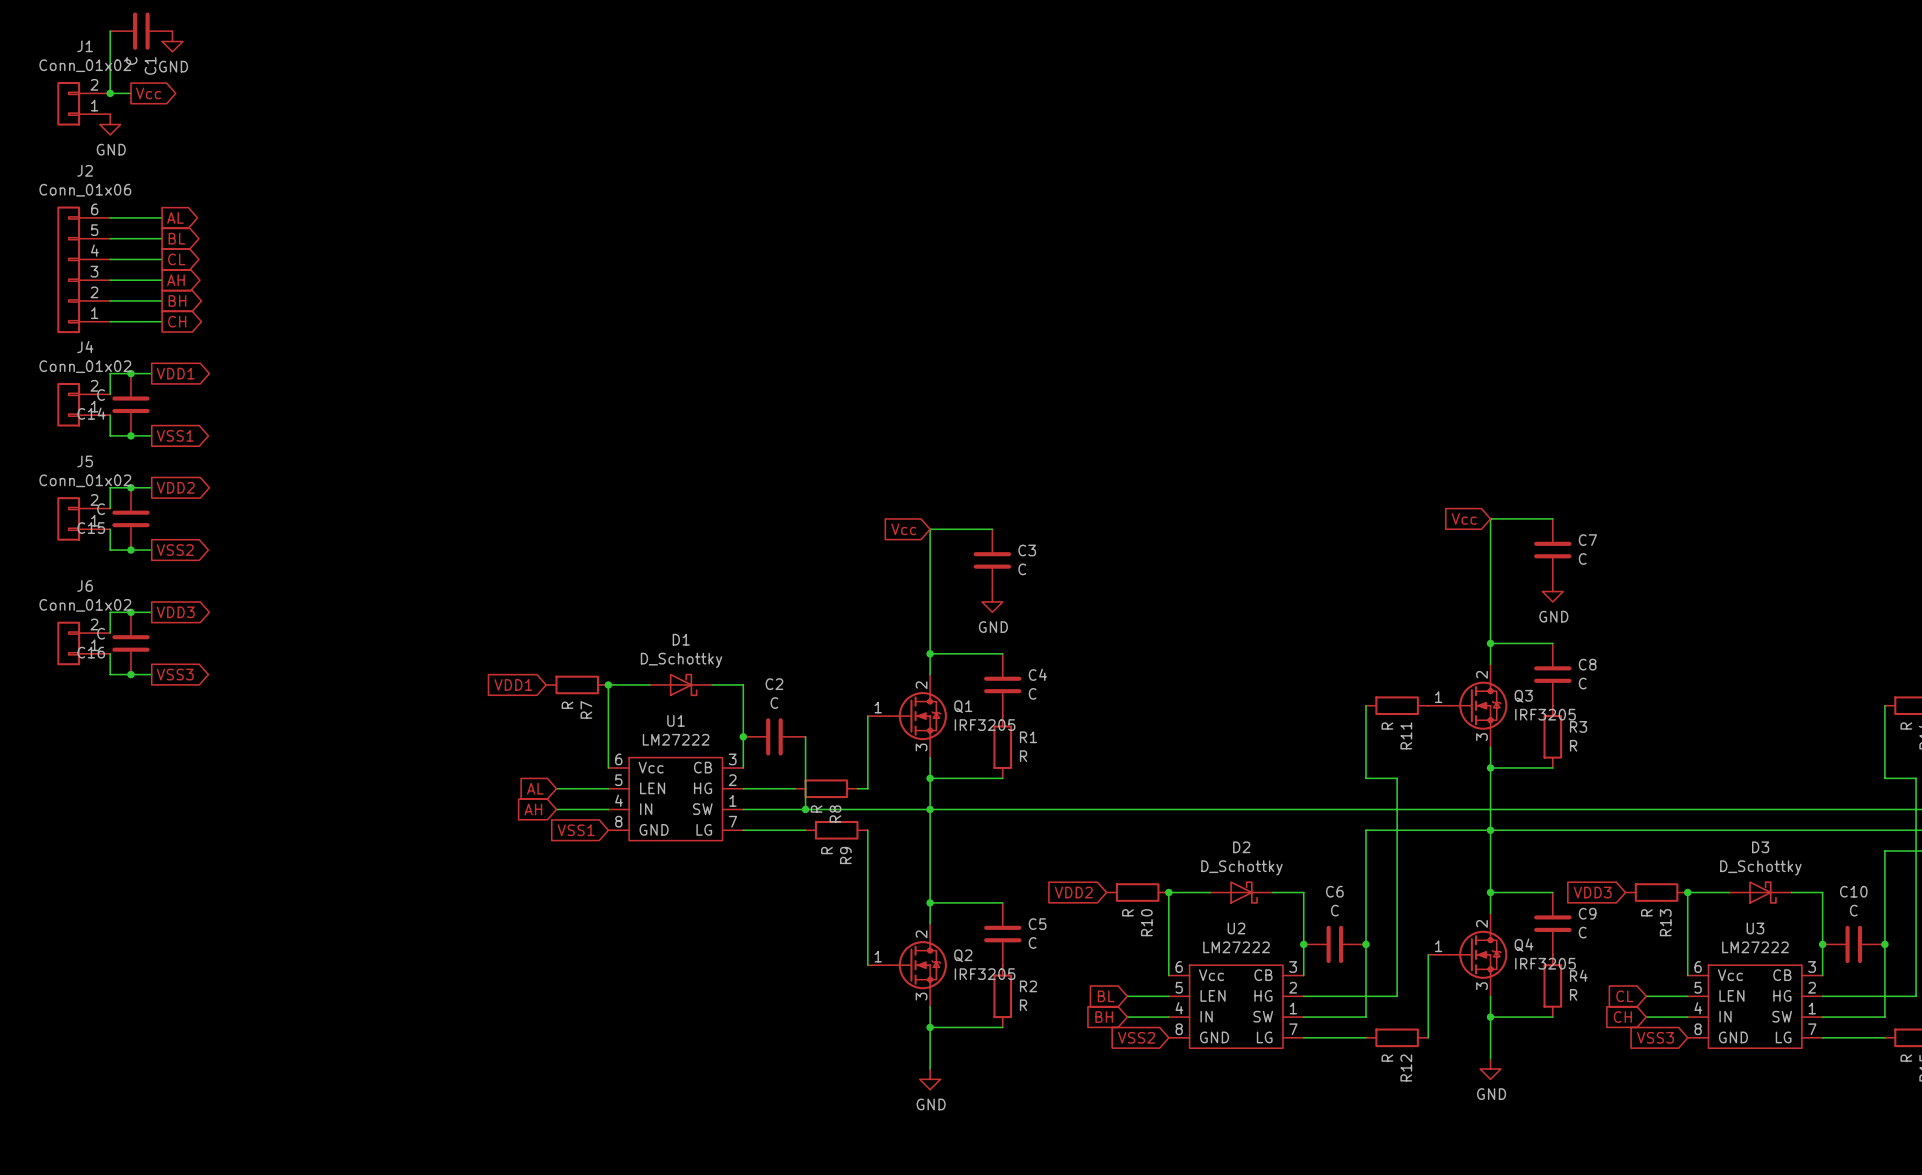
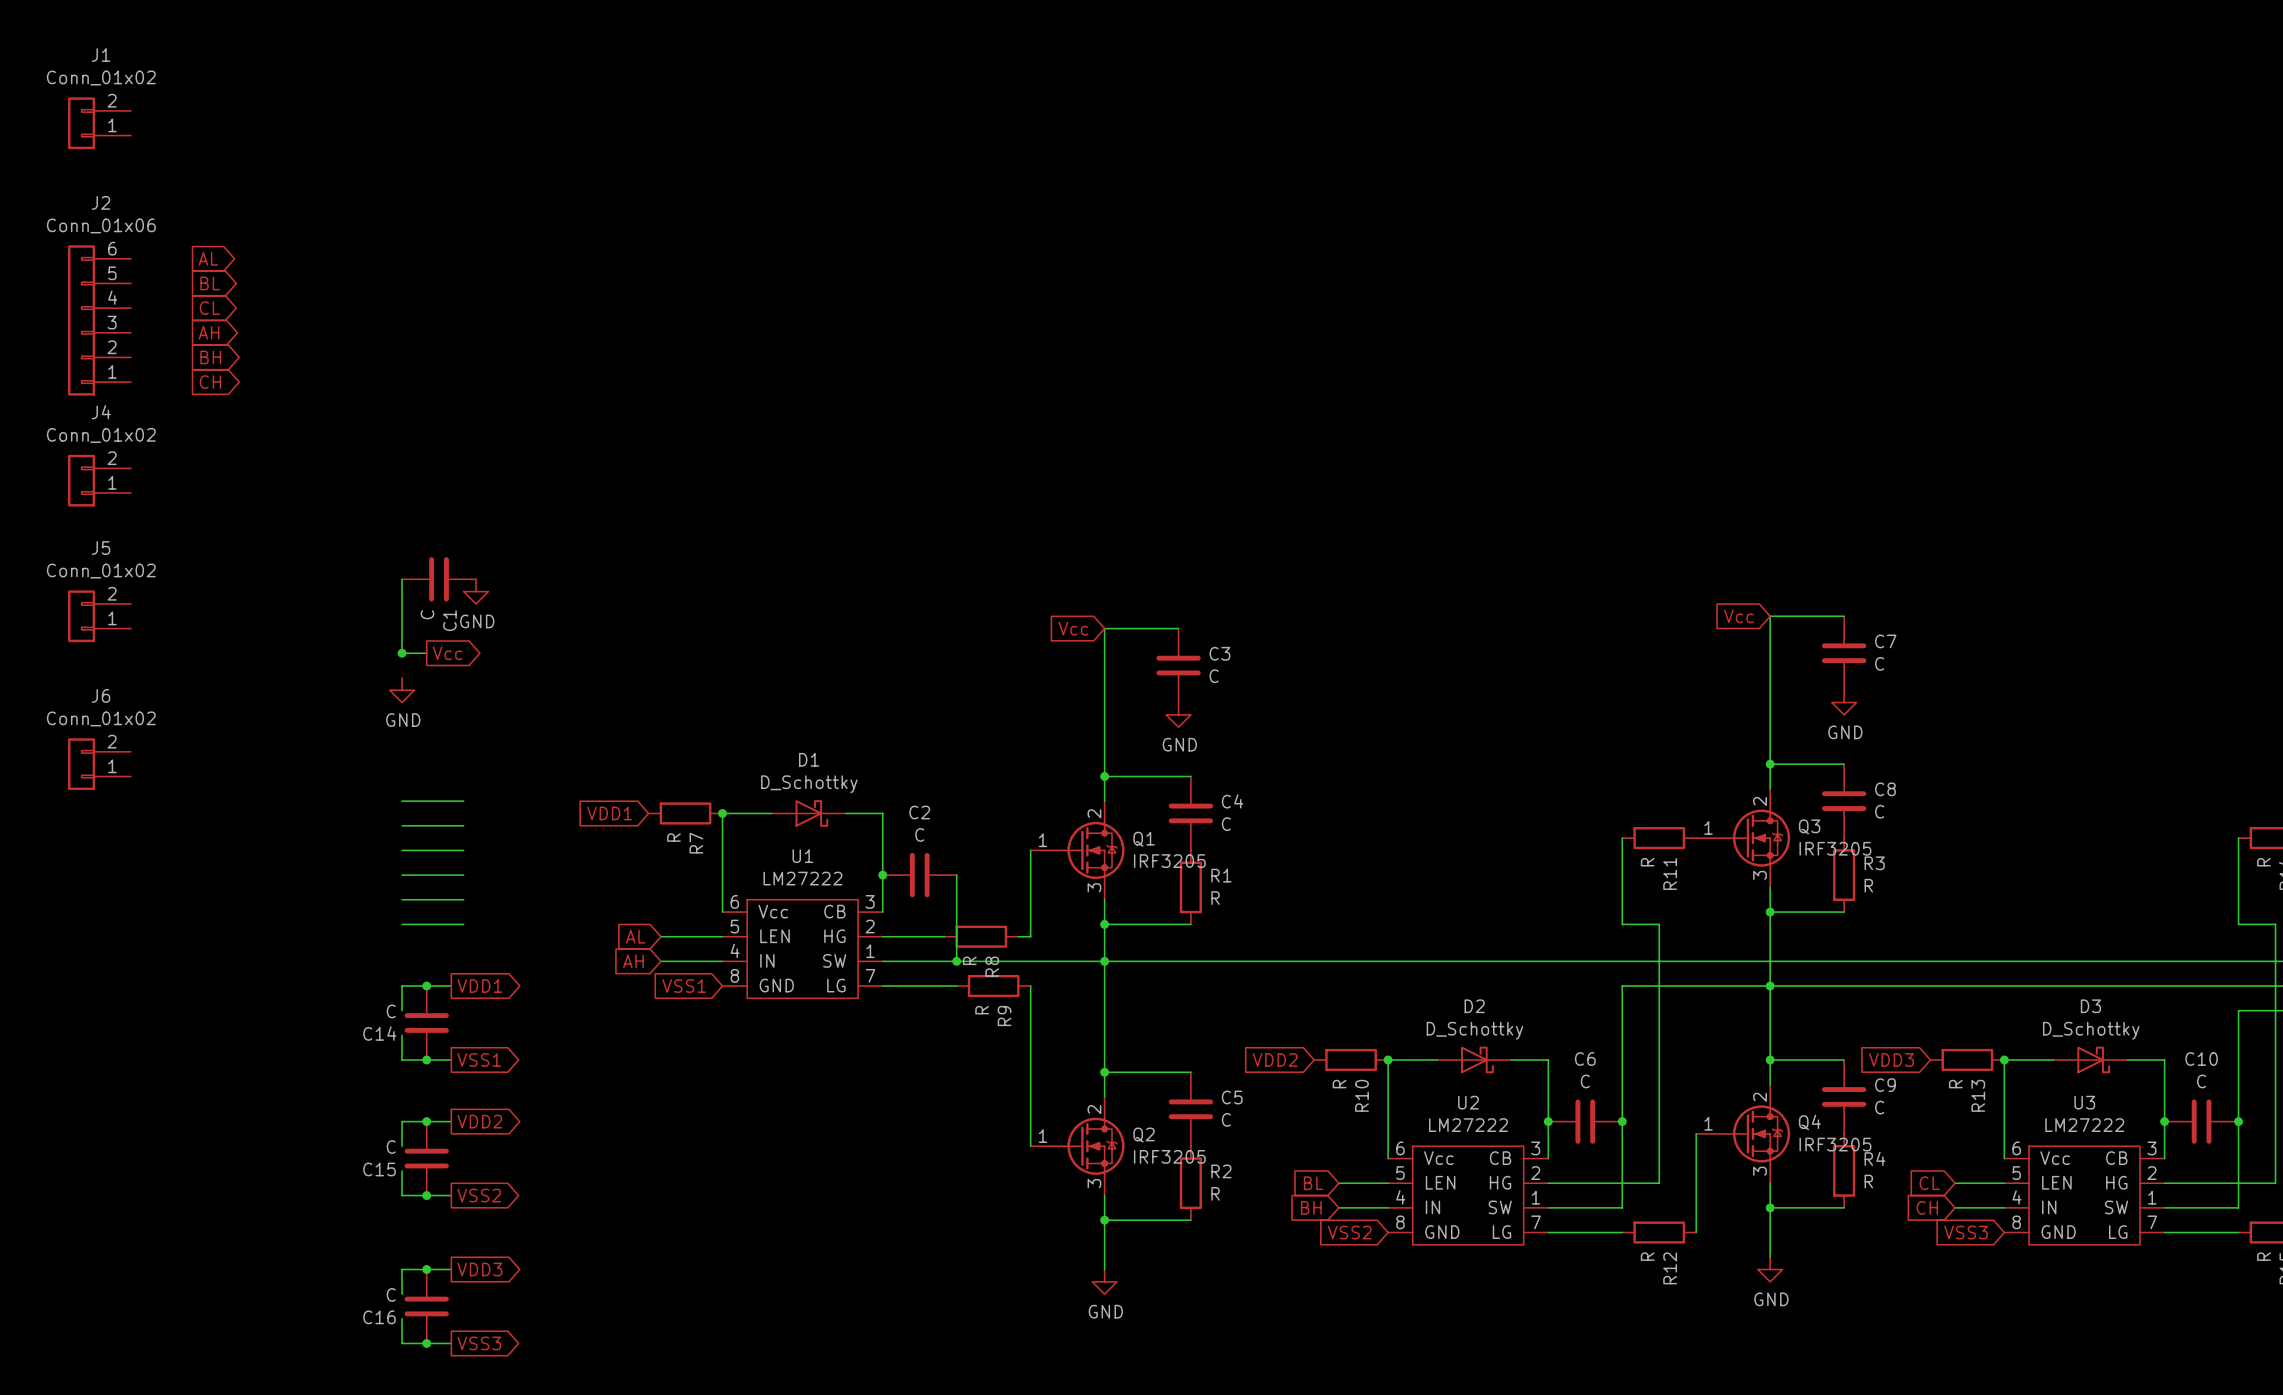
wire: (110, 31) (110, 93) (130, 93) -> none
C1 position: (141, 31) -> (439, 579)
power symbol: GND (172, 41) -> none
junction: (110, 93) -> none
global label: Vcc (148, 93) -> none
power symbol: GND (110, 124) -> none
wire: (110, 217) (162, 217) -> none
wire: (110, 238) (162, 238) -> none
wire: (110, 259) (162, 259) -> none
wire: (110, 280) (162, 280) -> none
wire: (110, 300) (162, 300) -> none
wire: (110, 321) (162, 321) -> none
junction: (130, 373) -> none
wire: (151, 373) (110, 373) (110, 394) -> none
global label: VDD1 (175, 373) -> none
C14 position: (130, 404) -> (426, 1023)
wire: (110, 415) (110, 435) (151, 435) -> none
junction: (130, 435) -> none
global label: VSS1 (175, 435) -> none
junction: (130, 487) -> none
wire: (151, 487) (110, 487) (110, 508) -> none
global label: VDD2 (175, 487) -> none
wire: none -> (402, 579) (402, 653) (426, 653)
power symbol: none -> GND (476, 591)
C15 position: (130, 518) -> (426, 1158)
wire: (110, 529) (110, 550) (151, 550) -> none
junction: (130, 550) -> none
global label: VSS2 (175, 550) -> none
junction: none -> (402, 653)
global label: none -> Vcc (447, 653)
power symbol: none -> GND (402, 690)
junction: (130, 612) -> none
wire: (151, 612) (110, 612) (110, 633) -> none
global label: VDD3 (175, 612) -> none
C16 position: (130, 643) -> (426, 1306)
wire: (110, 653) (110, 674) (151, 674) -> none
junction: (130, 674) -> none
global label: VSS3 (175, 674) -> none
wire: none -> (402, 801) (463, 801)
wire: none -> (402, 825) (463, 825)
wire: none -> (402, 850) (463, 850)
wire: none -> (402, 875) (463, 875)
wire: none -> (402, 899) (463, 899)
wire: none -> (402, 924) (463, 924)
junction: none -> (426, 986)
wire: none -> (451, 986) (402, 986) (402, 1010)
global label: none -> VDD1 (479, 986)
wire: none -> (402, 1035) (402, 1059) (451, 1059)
junction: none -> (426, 1059)
global label: none -> VSS1 (479, 1059)
junction: none -> (426, 1121)
wire: none -> (451, 1121) (402, 1121) (402, 1146)
global label: none -> VDD2 (479, 1121)
wire: none -> (402, 1170) (402, 1195) (451, 1195)
junction: none -> (426, 1195)
global label: none -> VSS2 (479, 1195)
junction: none -> (426, 1269)
wire: none -> (451, 1269) (402, 1269) (402, 1294)
global label: none -> VDD3 (479, 1269)
wire: none -> (402, 1318) (402, 1343) (451, 1343)
junction: none -> (426, 1343)
global label: none -> VSS3 (479, 1343)

